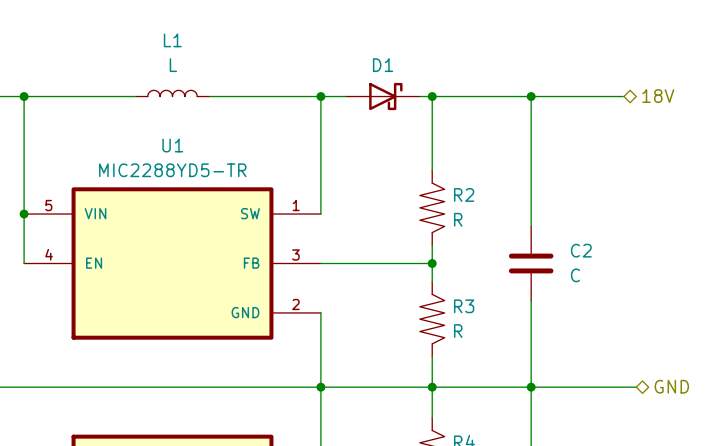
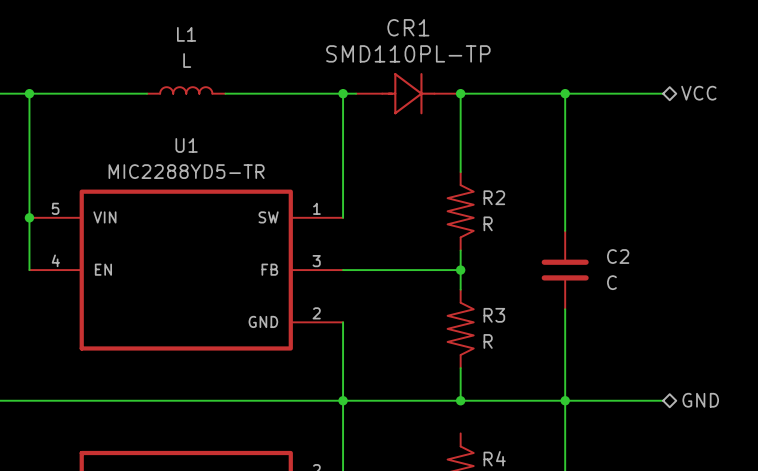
D1: (382, 96) -> none
CR1: none -> SMD110PL-TP (408, 93)
hierarchical label: 18V (658, 96) -> VCC (698, 93)
hierarchical label position: GND (671, 386) -> GND (700, 400)
wire: (432, 387) (432, 418) -> none
wire: (623, 387) (636, 387) -> none

